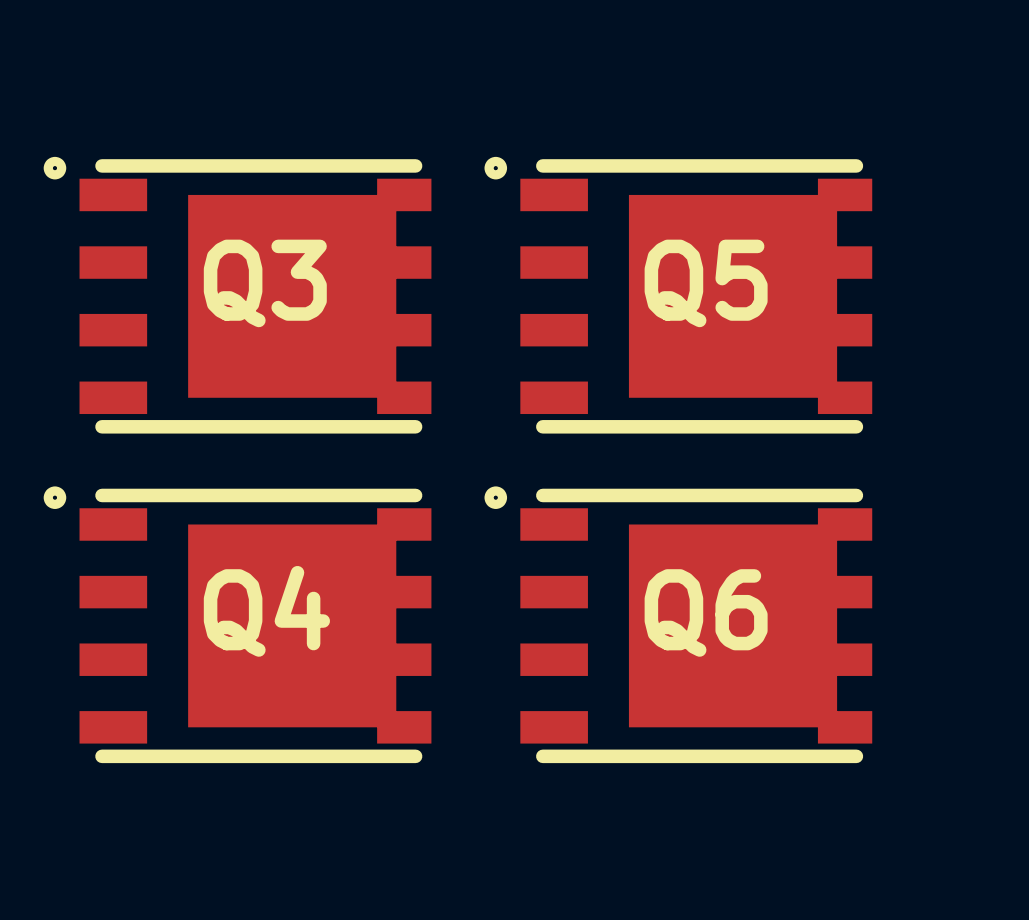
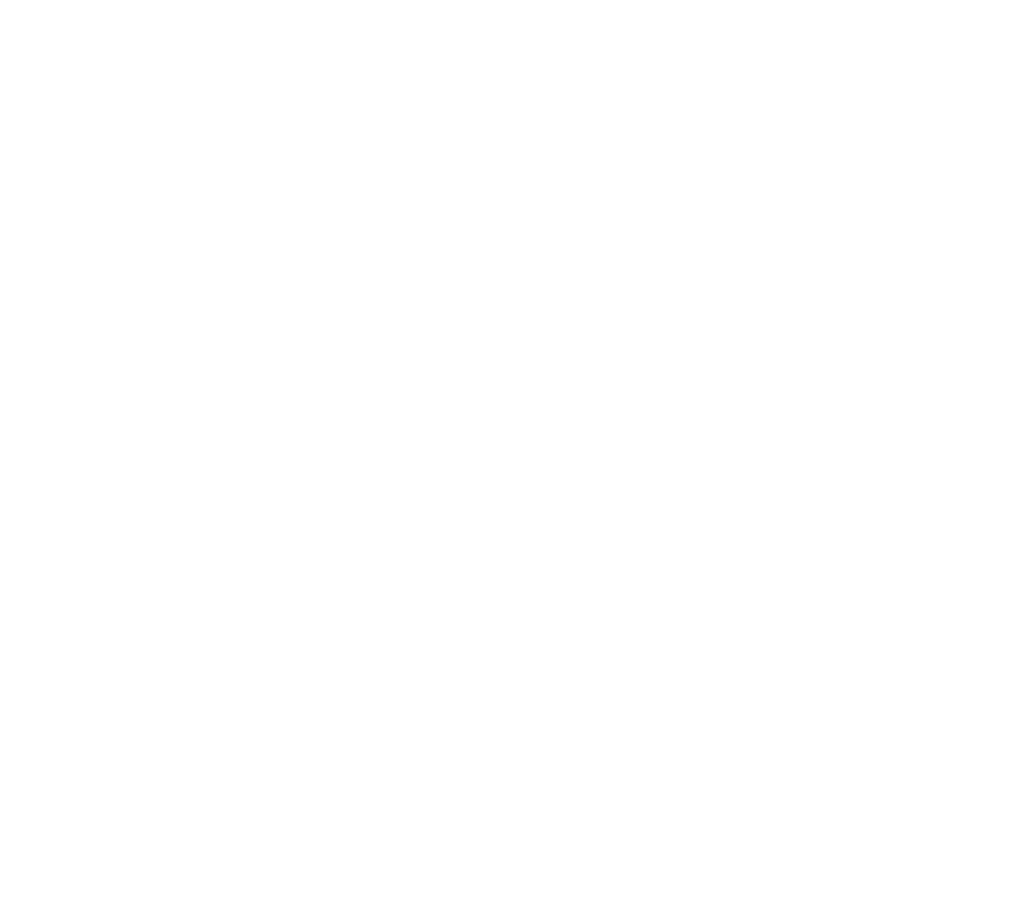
Q3: (237, 295) -> none
Q5: (678, 295) -> none
Q4: (237, 624) -> none
Q6: (678, 624) -> none

